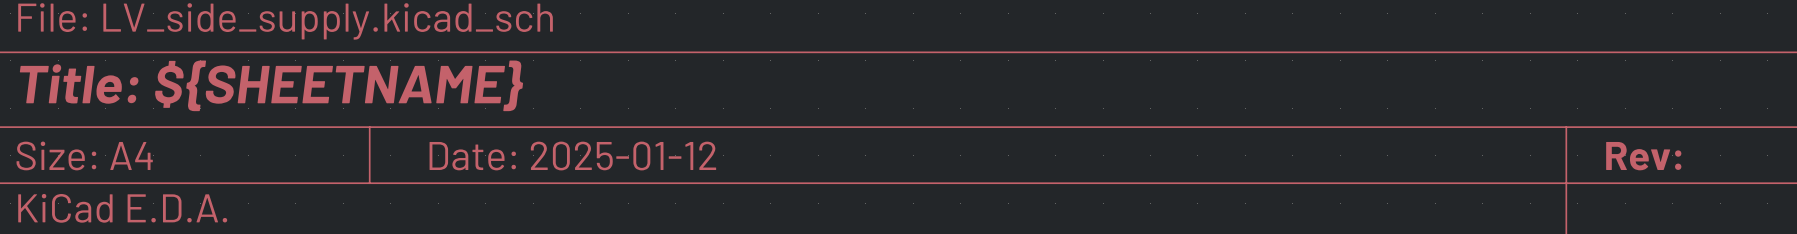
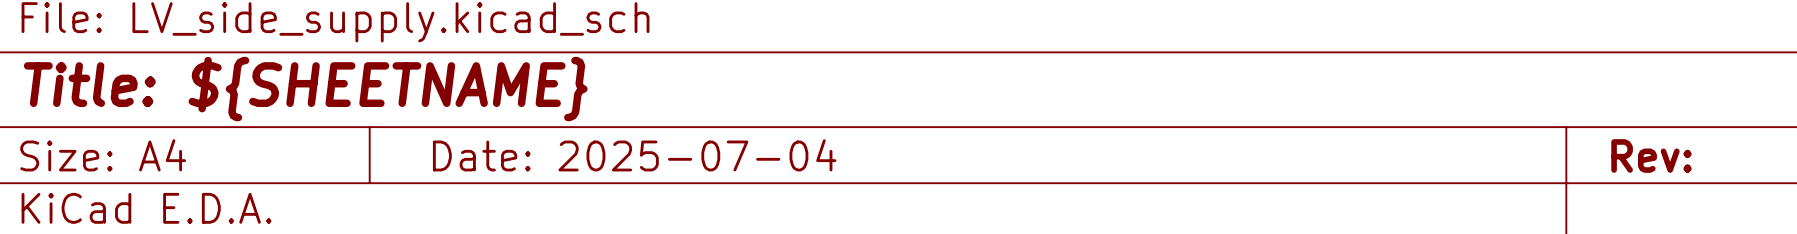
title block: Date: 2025-01-12 (572, 156) -> Date: 2025-07-04 (634, 155)

